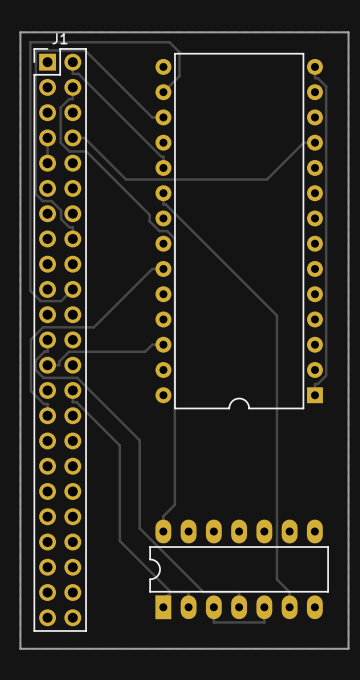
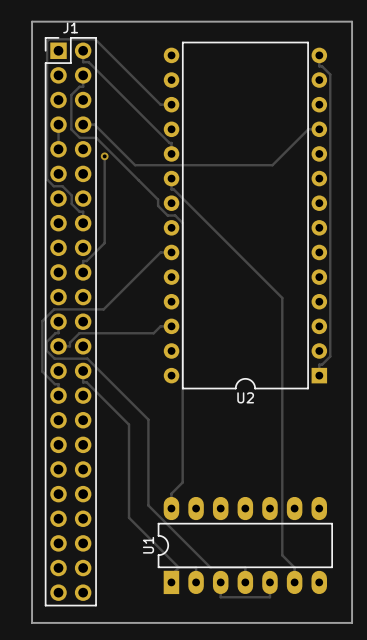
track: (163, 92) (179, 76) (179, 52) (169, 42) (30, 42) (30, 290) (40, 301) (61, 301) (72, 289) -> (104, 156) (104, 243) (86, 261) (83, 261) (83, 272)
via: none -> (104, 156)
U2 name: none -> U2 (245, 397)
U1 name: none -> U1 (148, 545)

